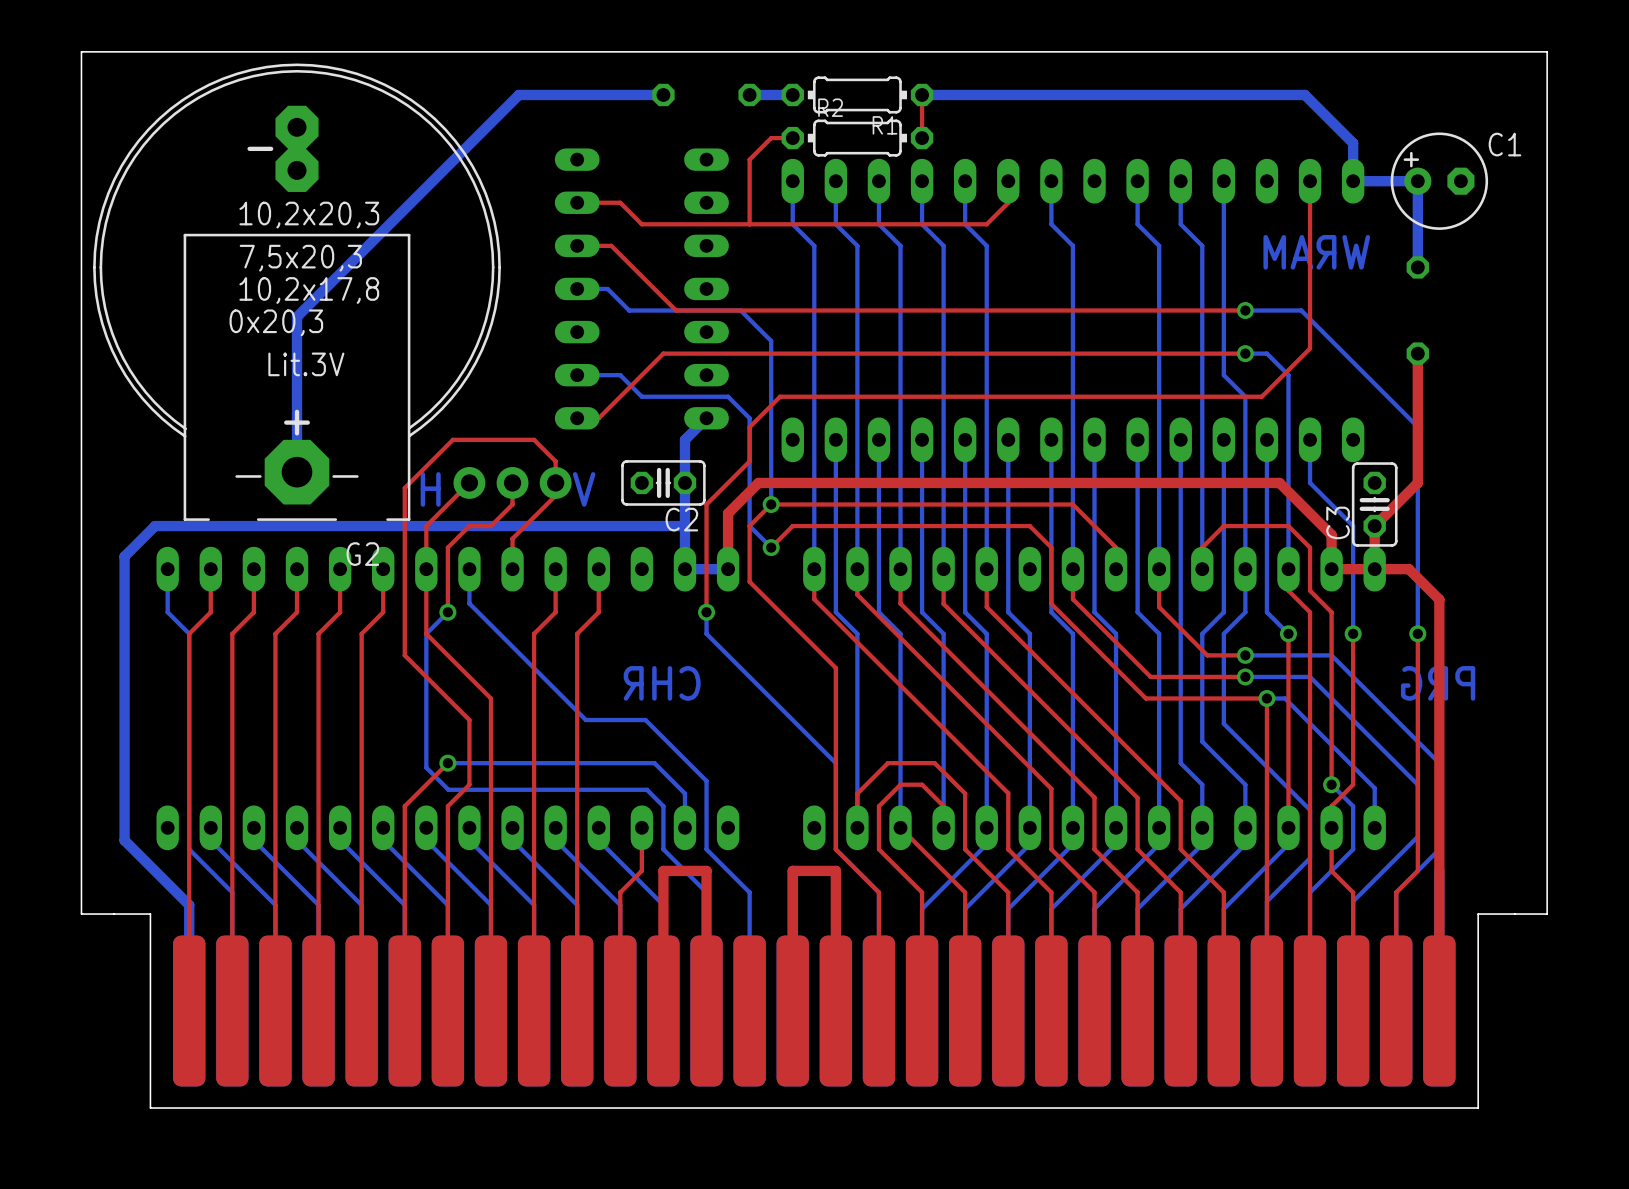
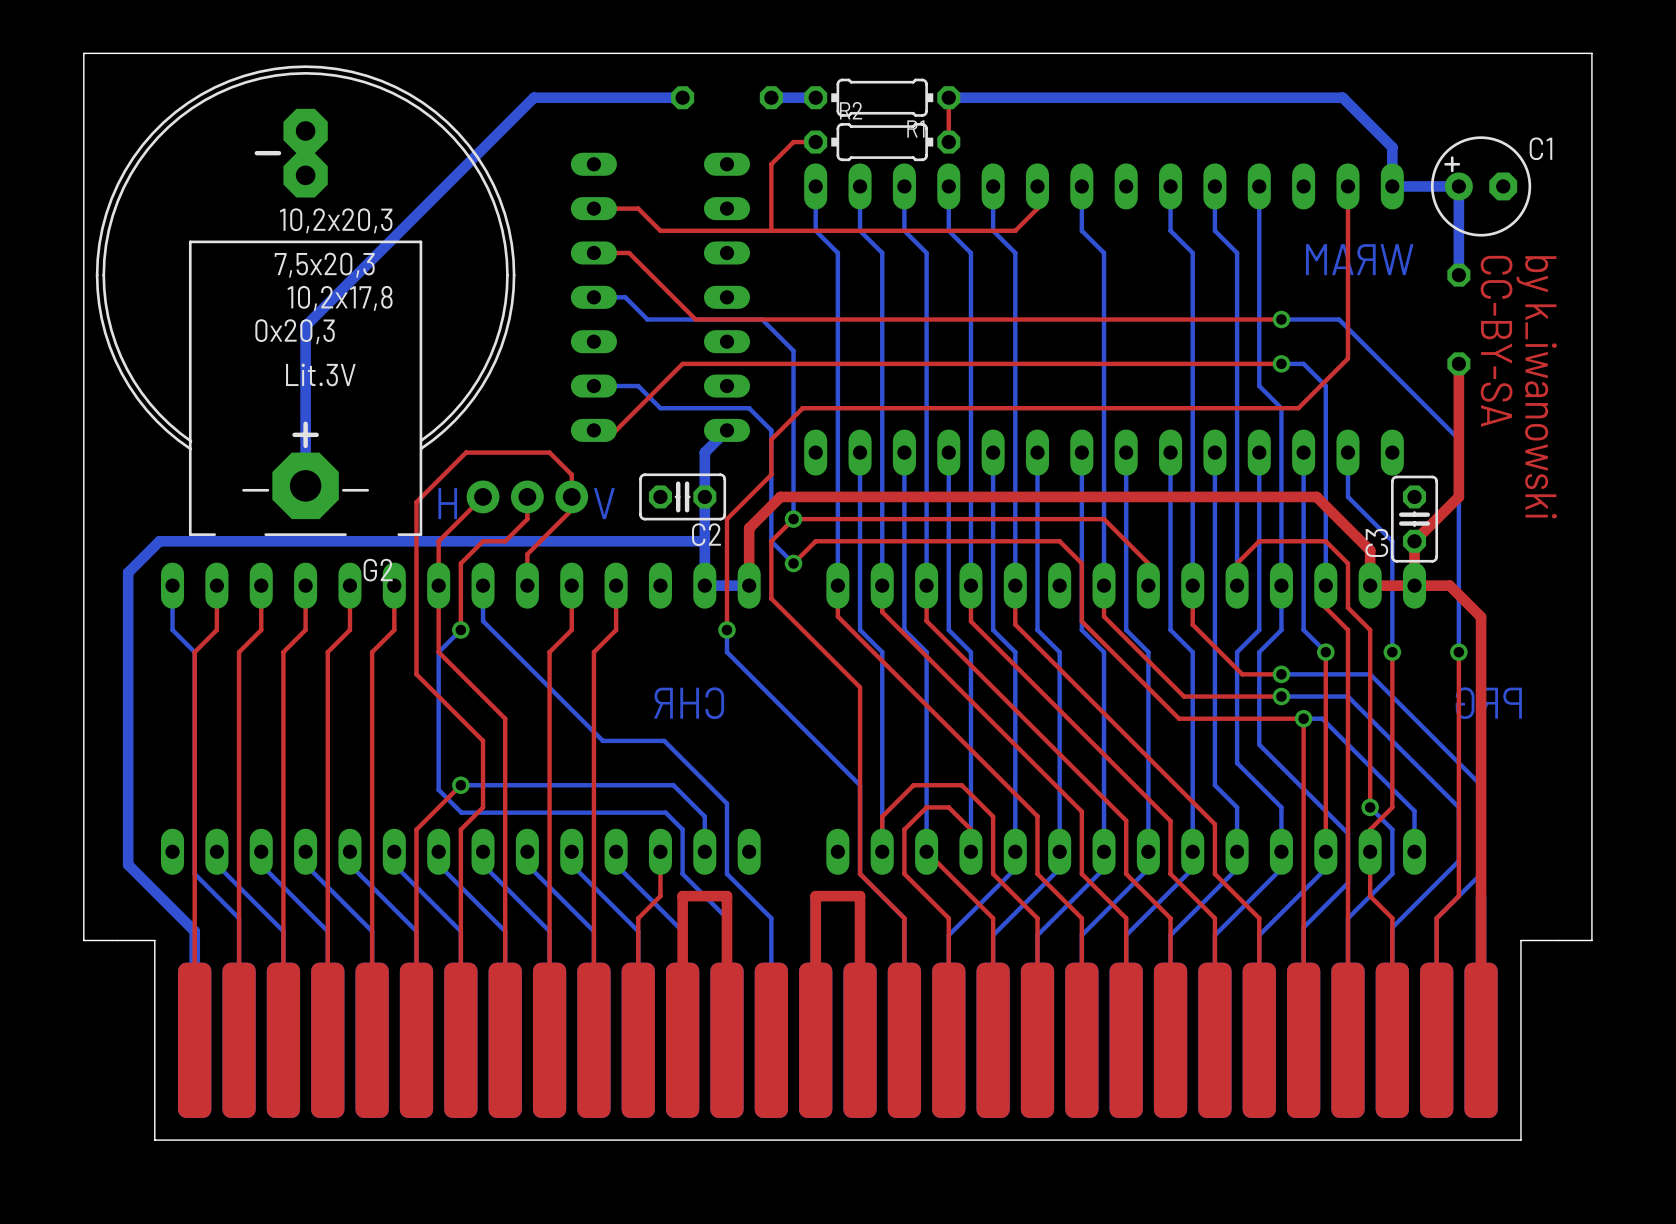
text: none -> CC-BY-SA (1496, 341)
text: none -> by k_iwanowski (1536, 387)

